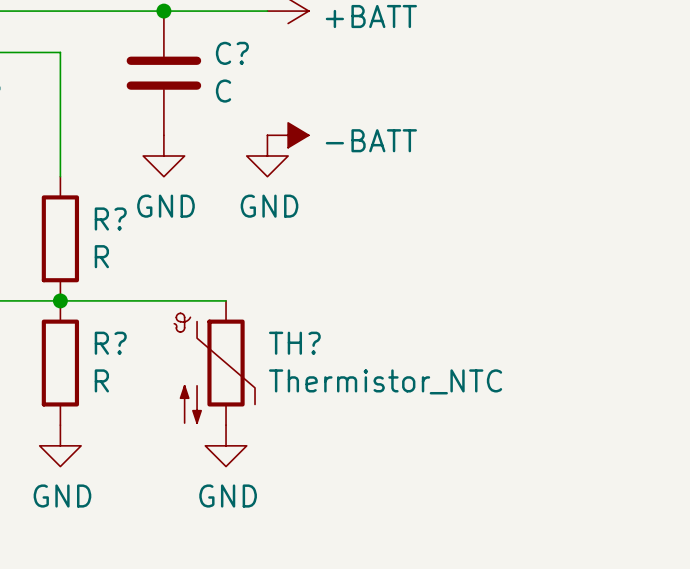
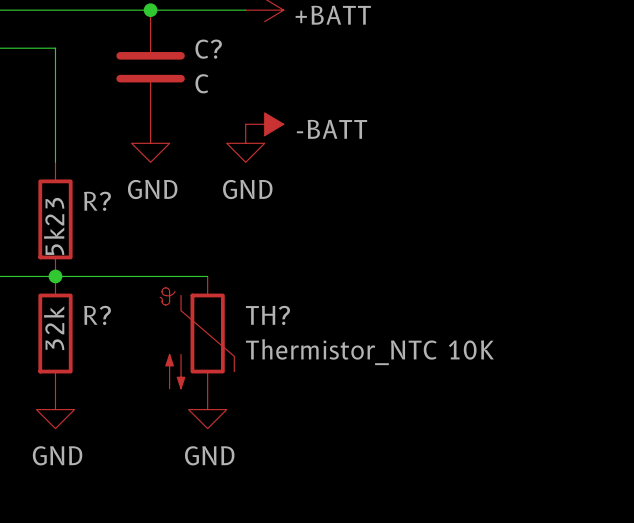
R? value: R (101, 256) -> 5k23 (54, 226)
R? value: R (101, 380) -> 32k (54, 328)
TH? value: Thermistor_NTC (385, 381) -> Thermistor_NTC 10K (369, 352)

